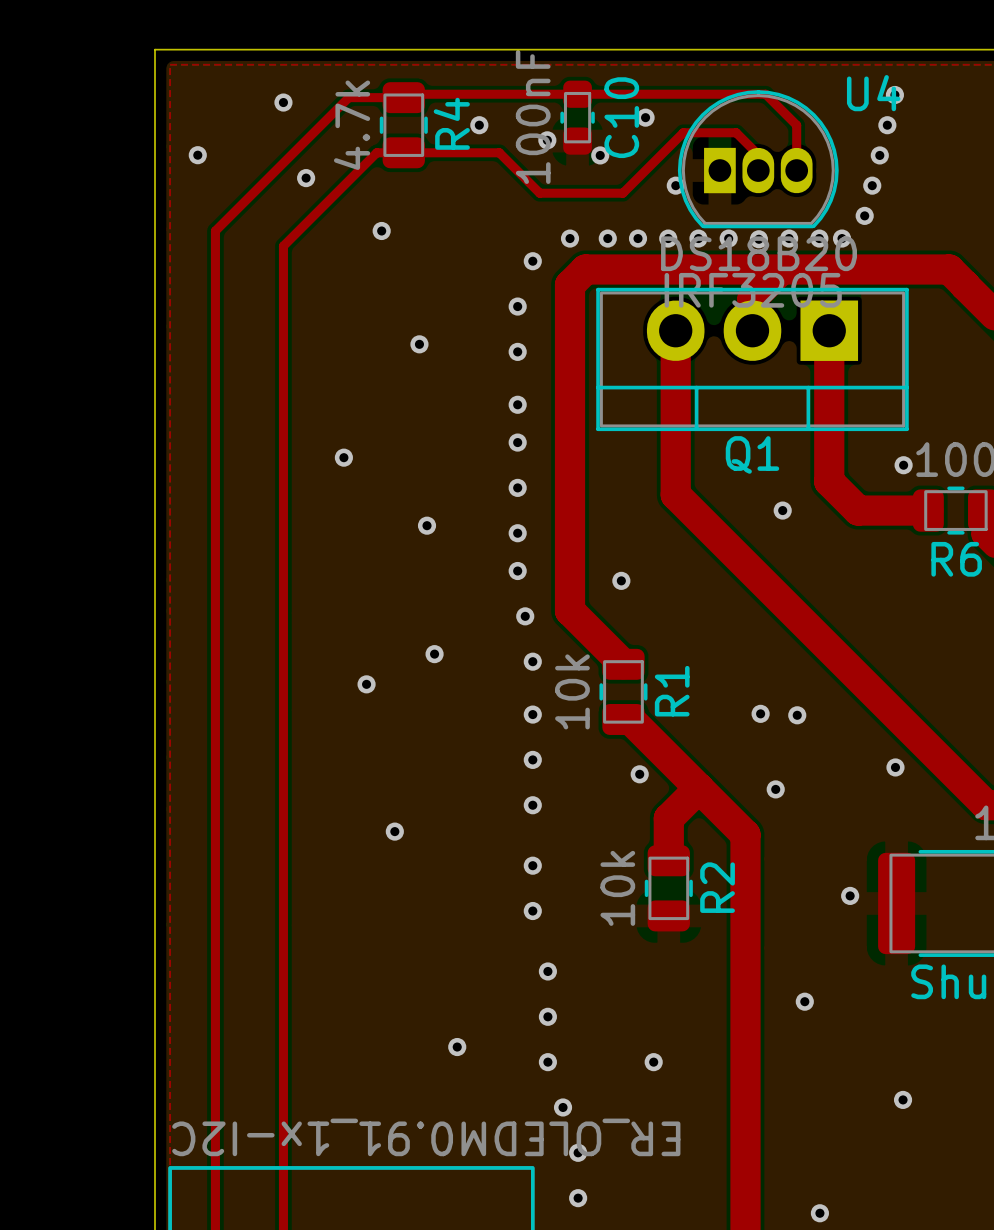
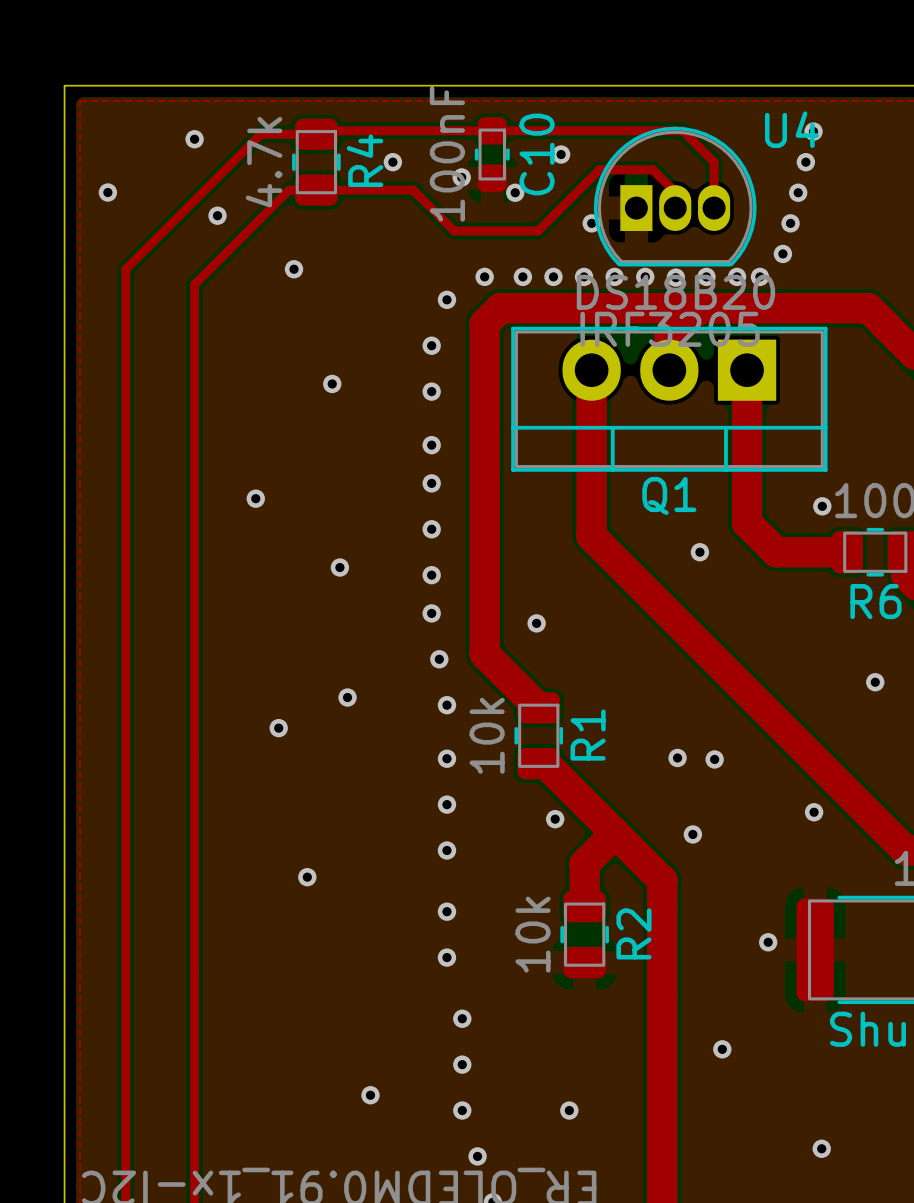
via: none -> (875, 682)

